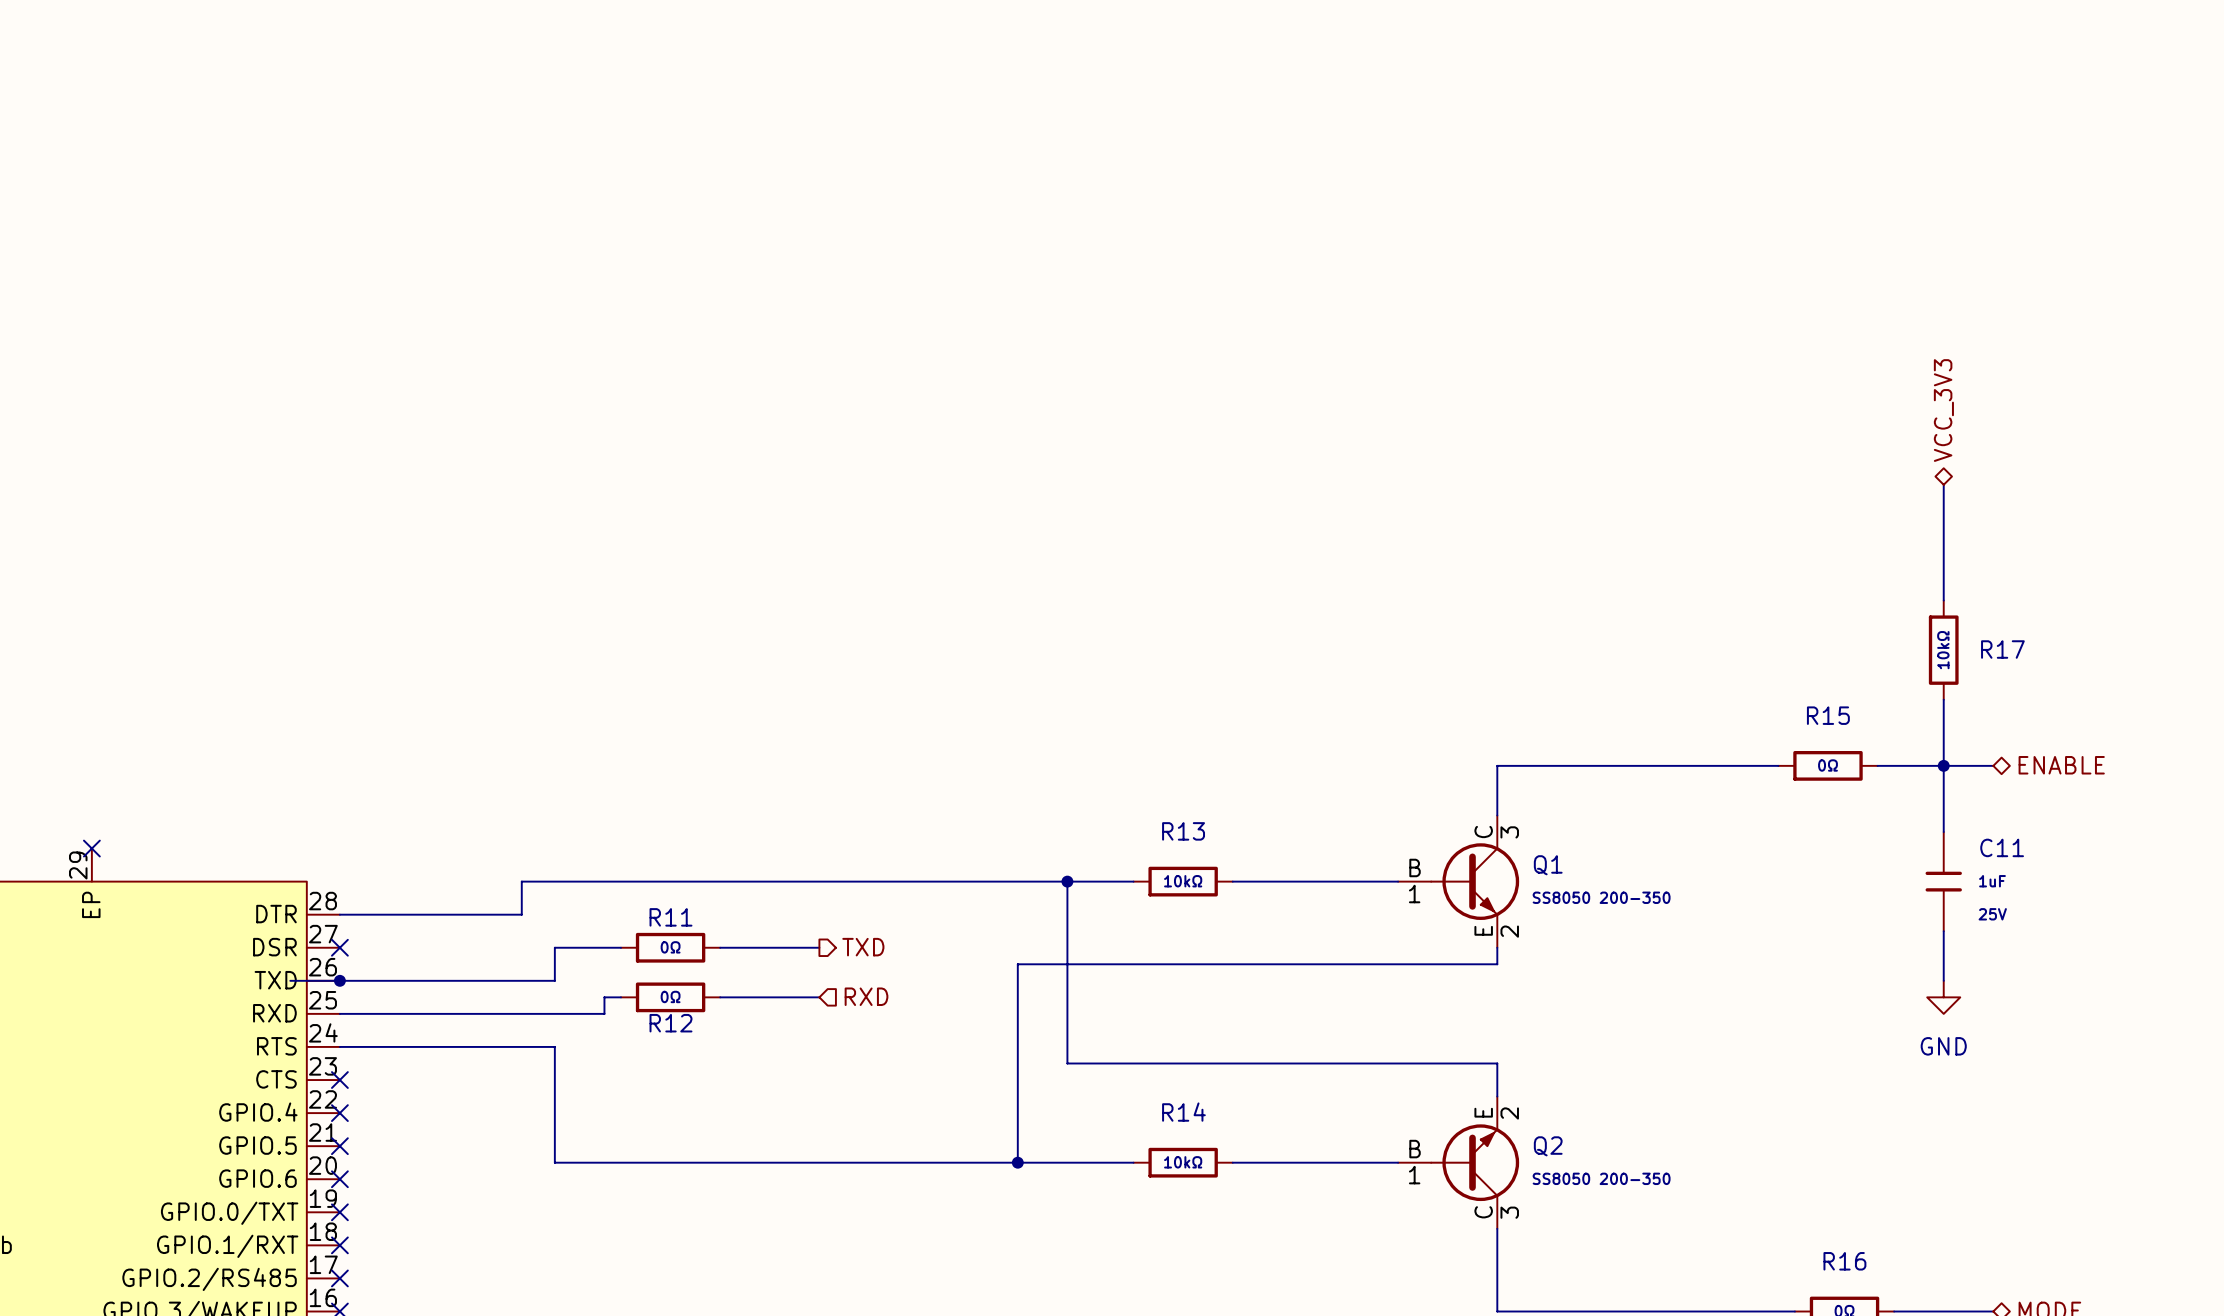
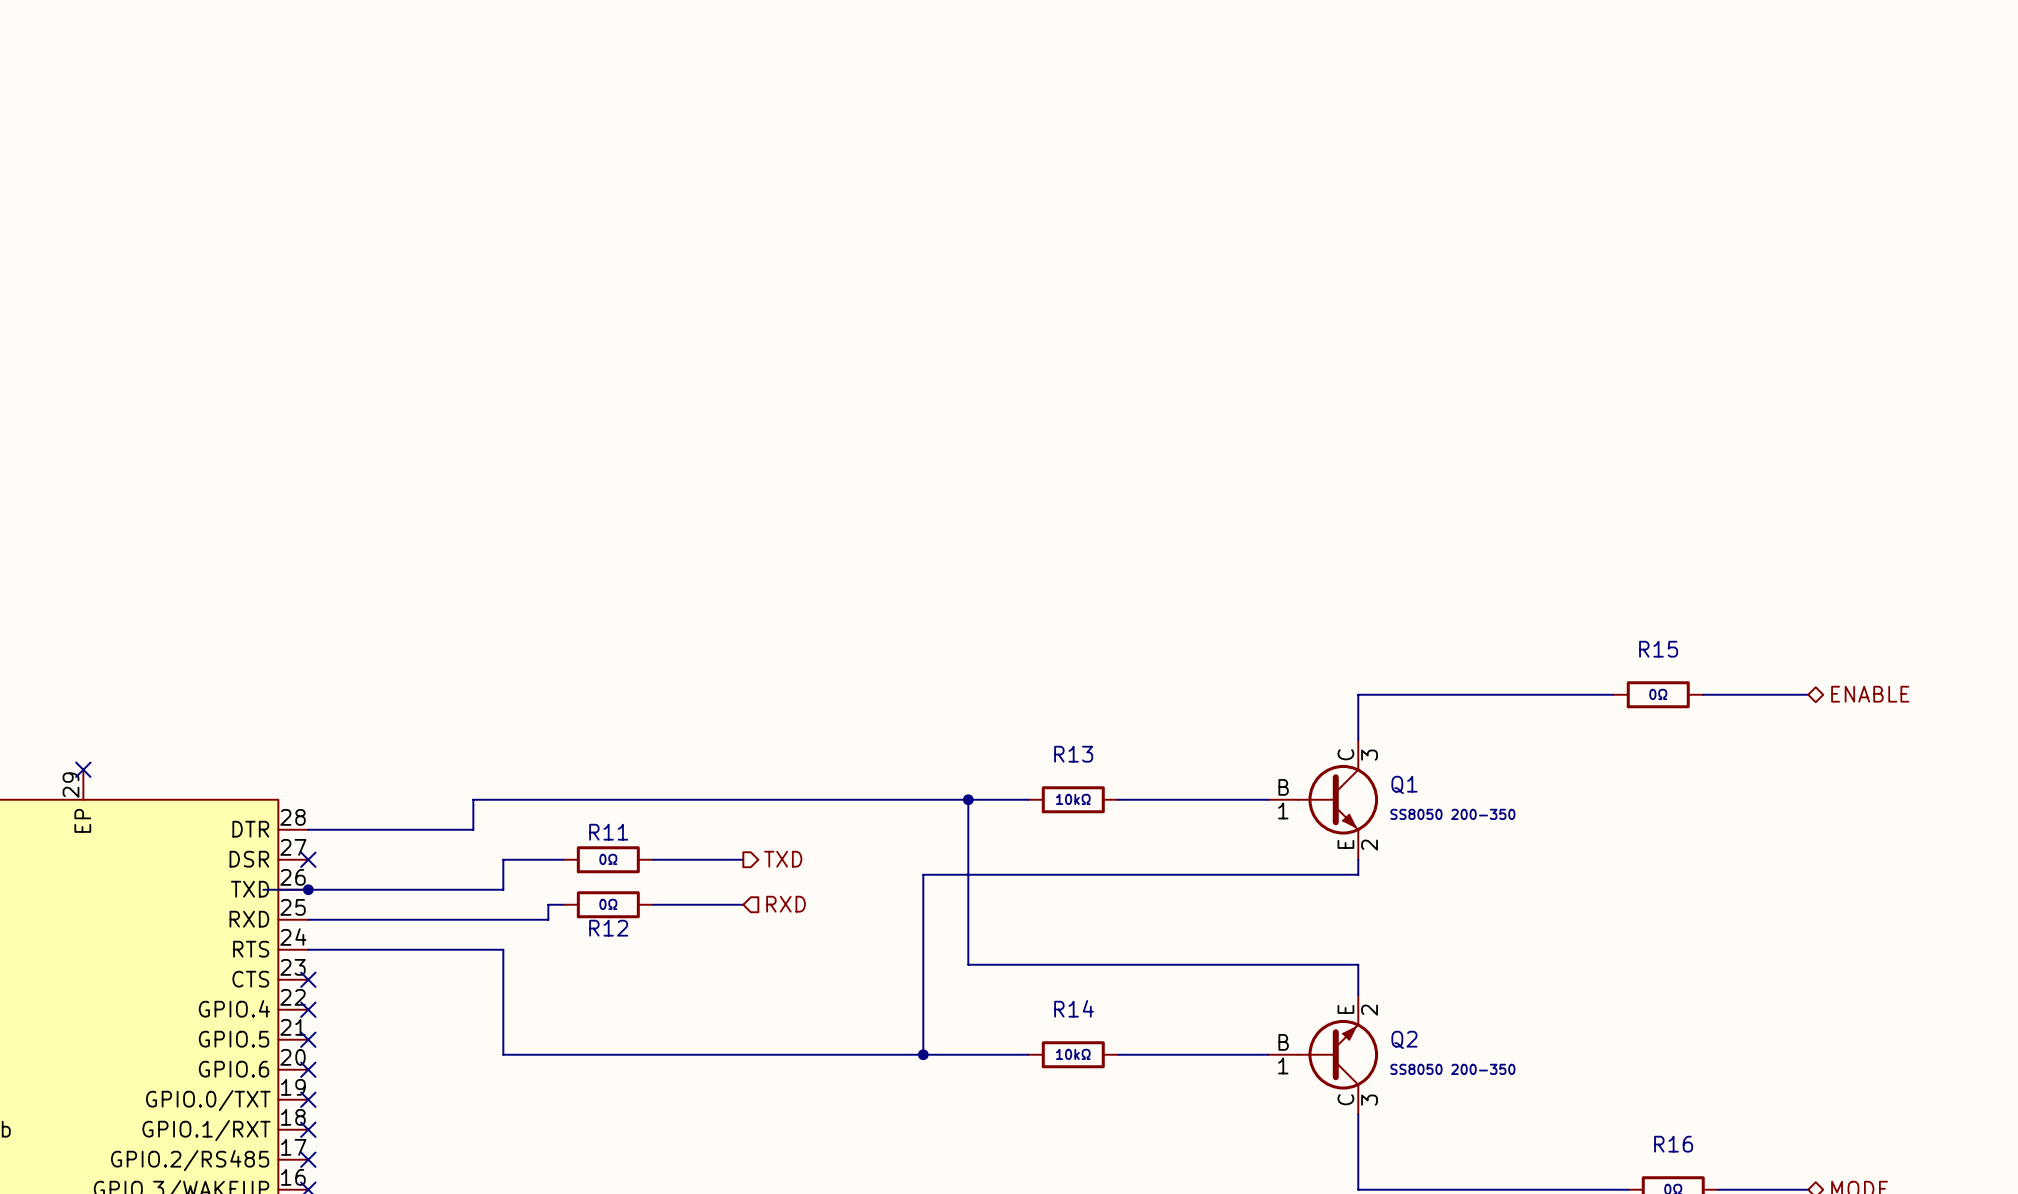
hierarchical label: VCC_3V3 (1943, 410) -> none
wire: (1943, 484) (1943, 600) -> none
R17: 10kΩ (1943, 650) -> none
wire: (1943, 699) (1943, 832) -> none
junction: (1943, 765) -> none
C11: 1uF (1943, 881) -> none
wire: (1943, 931) (1943, 980) -> none
power symbol: GND (1943, 997) -> none

